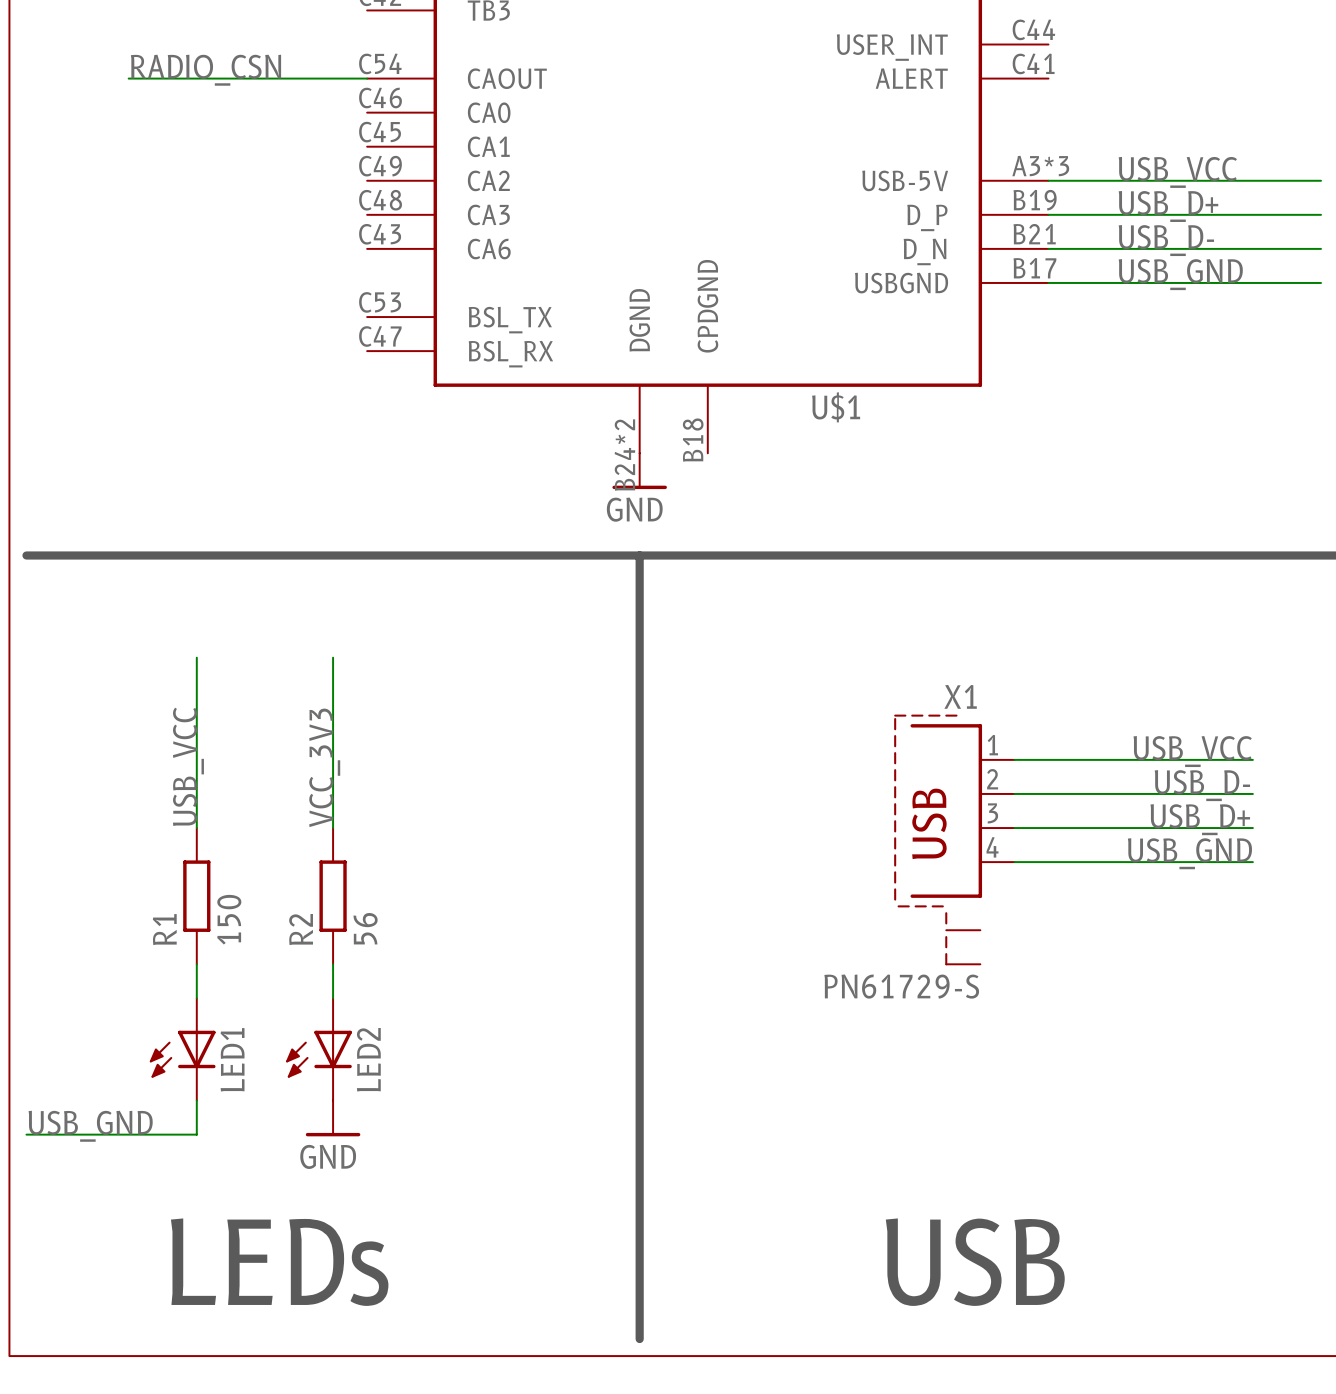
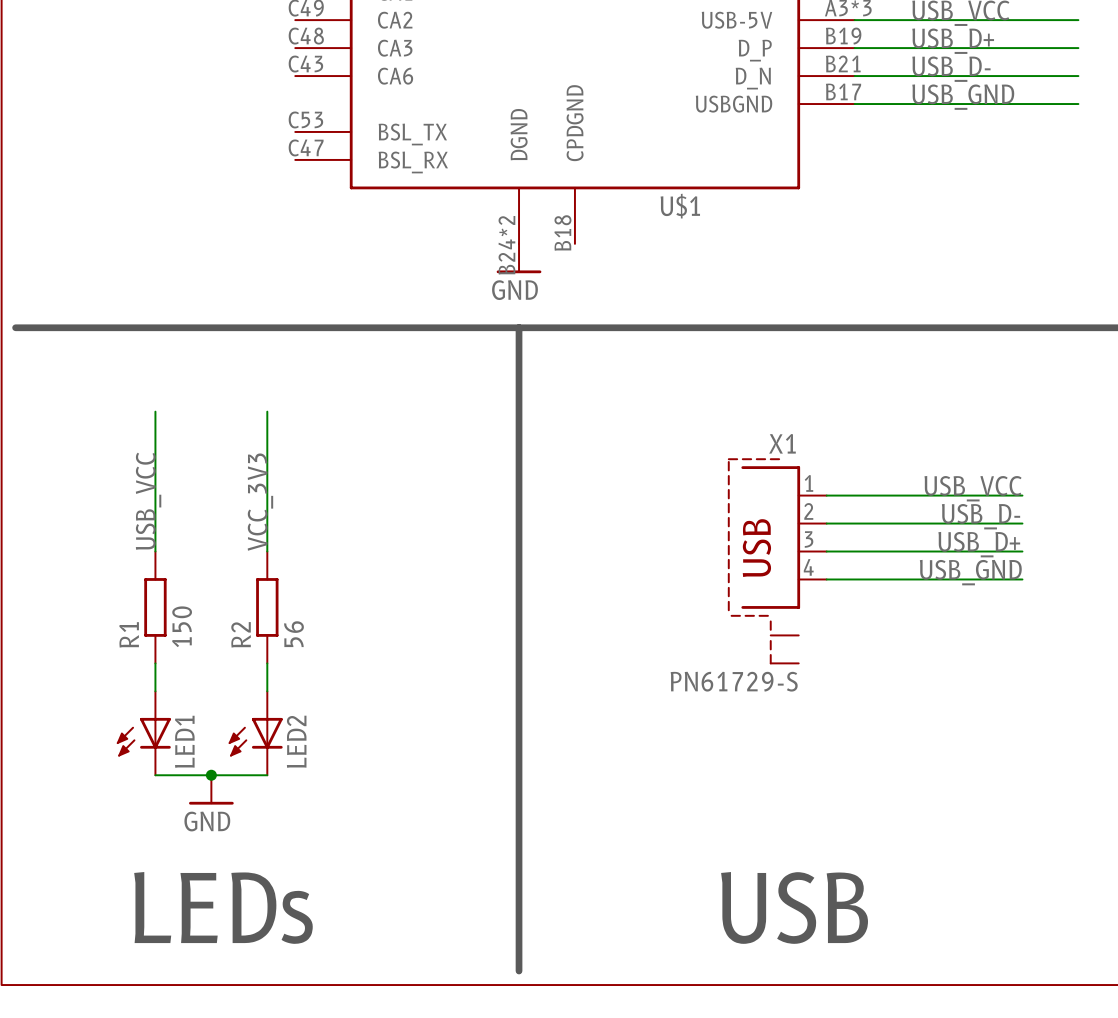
wire: (196, 1100) (196, 1134) (26, 1134) -> (155, 775) (267, 775)
junction: none -> (211, 775)
power symbol position: GND (333, 1118) -> GND (211, 789)
label: USB_GND (90, 1126) -> none

